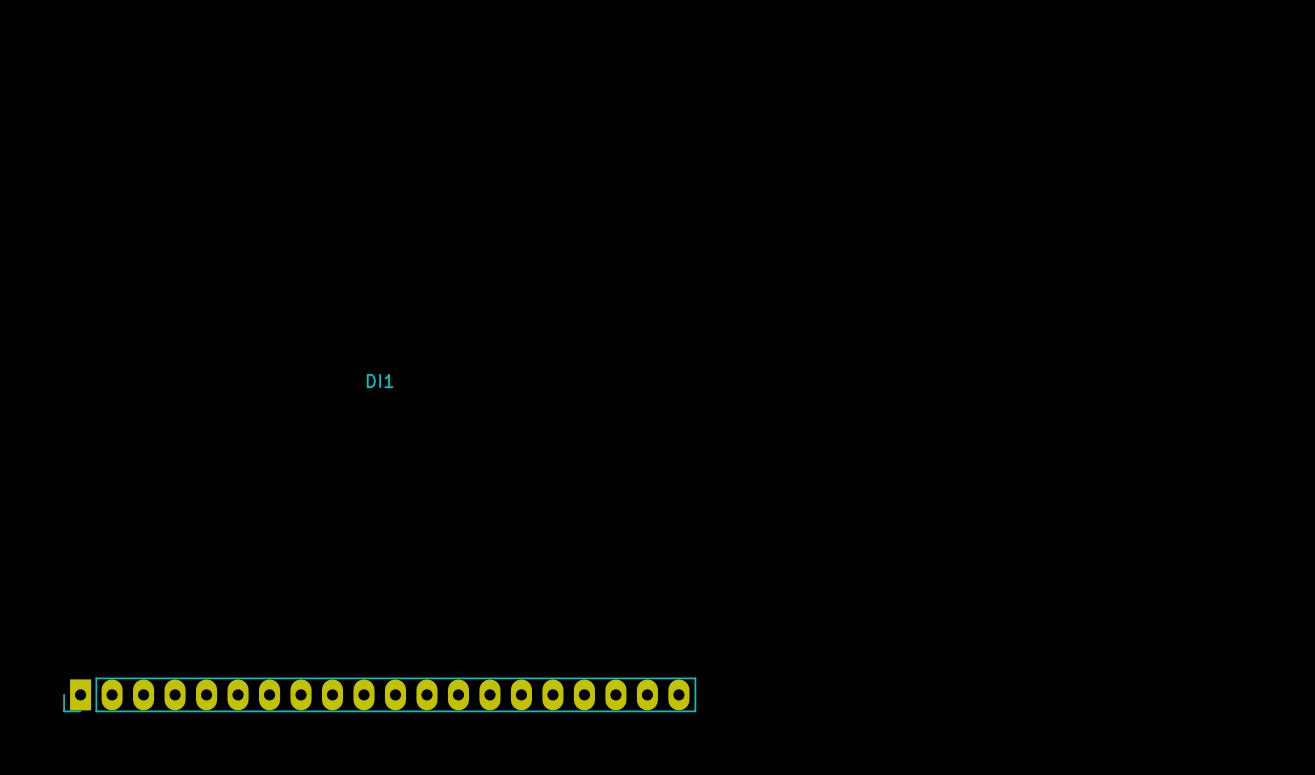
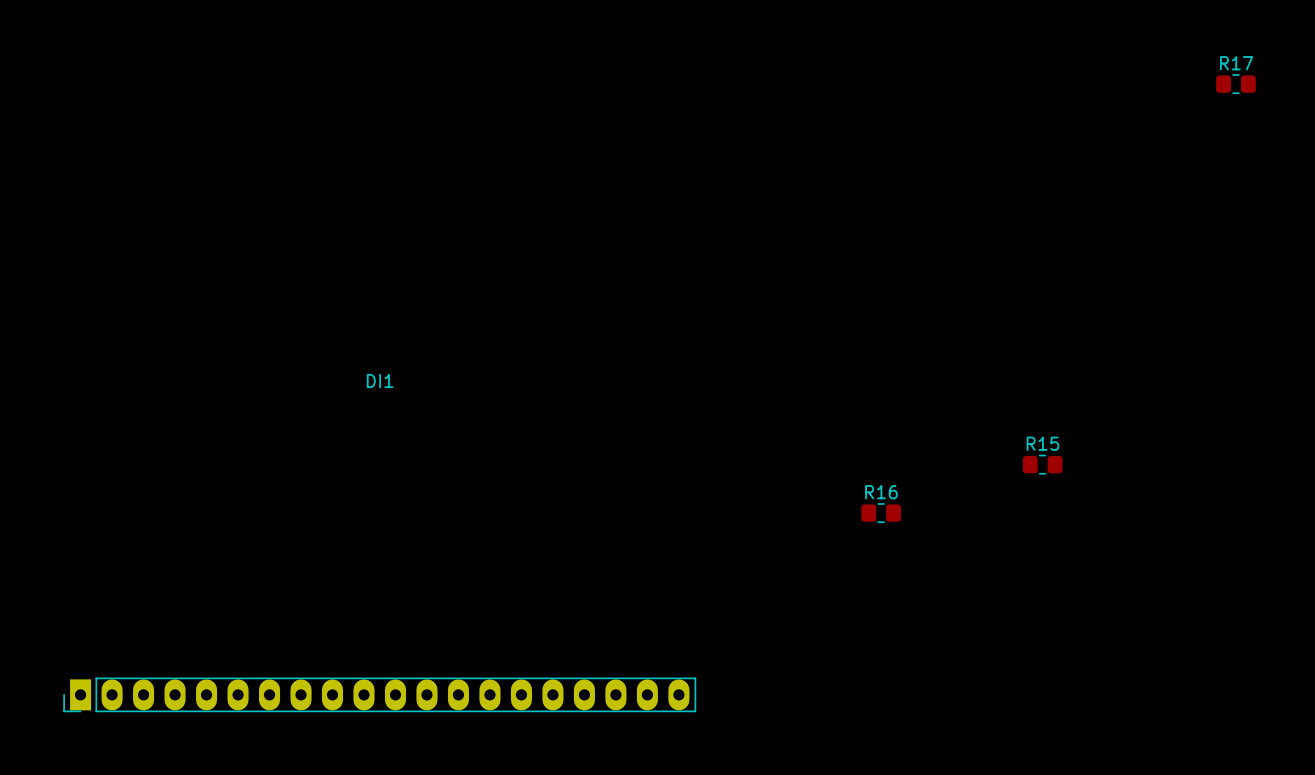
R17: none -> (1235, 84)
R15: none -> (1042, 464)
R16: none -> (881, 513)

